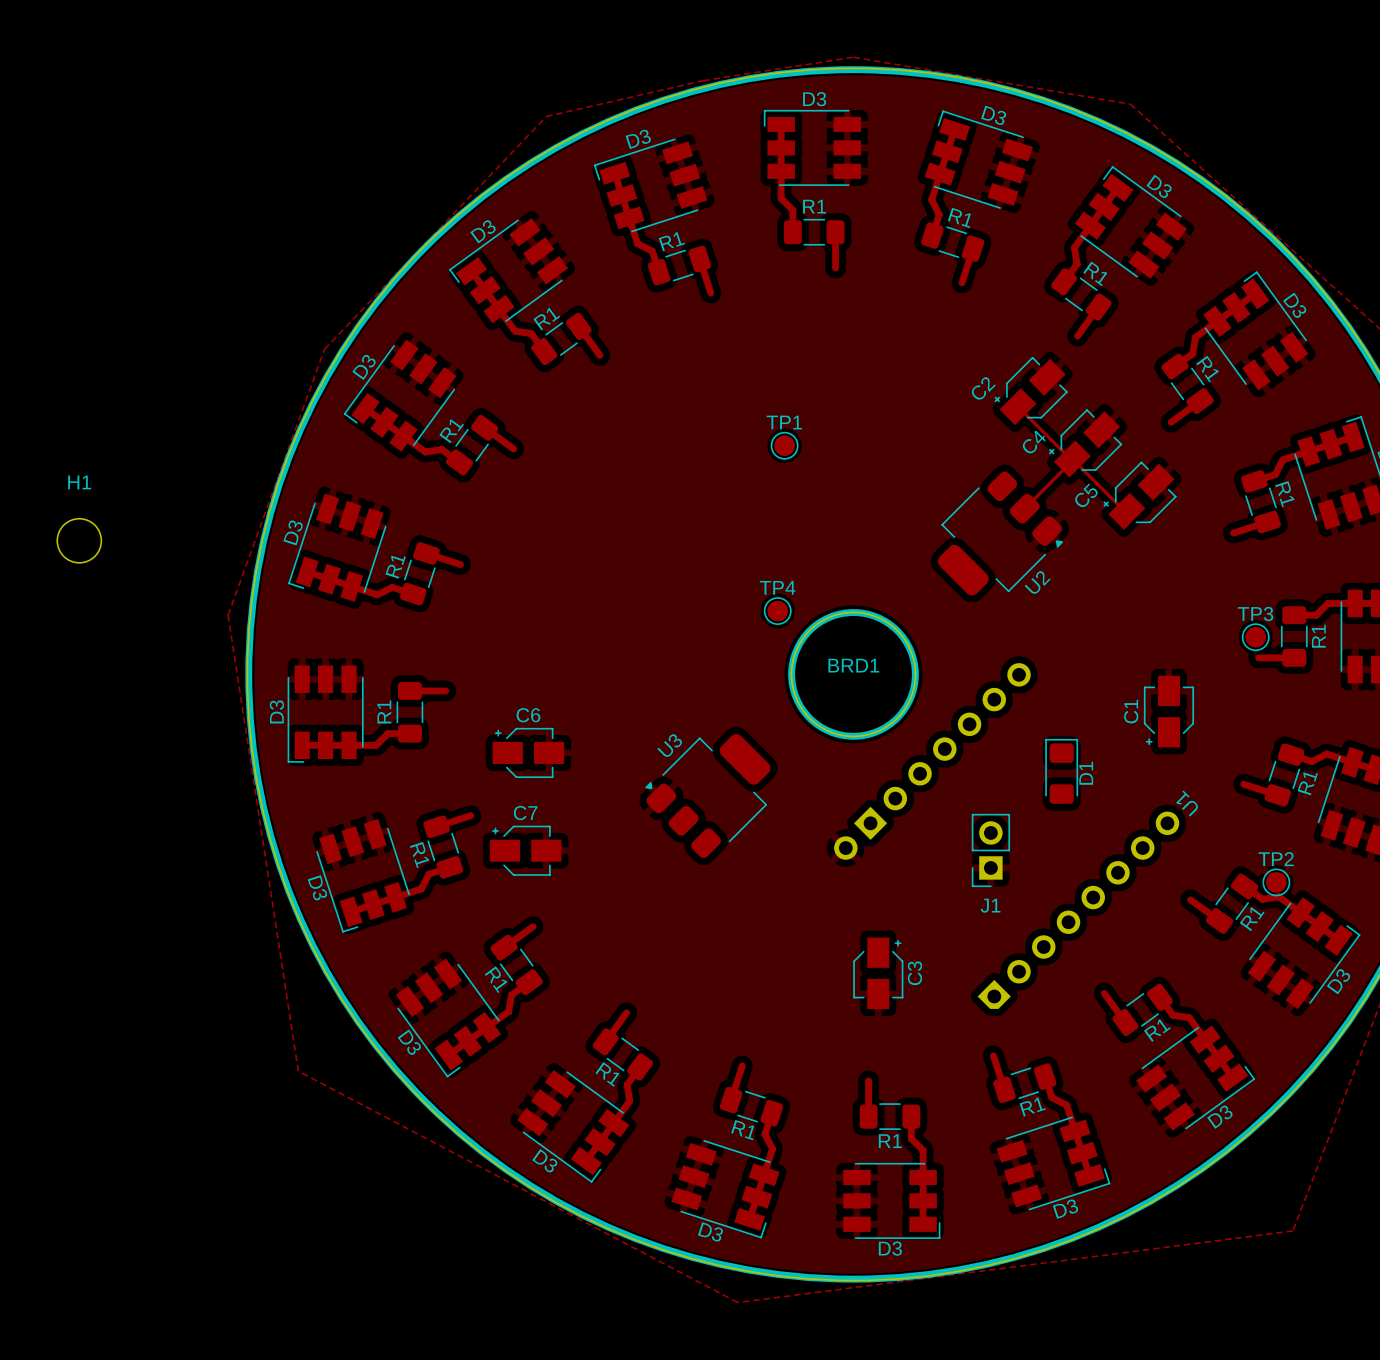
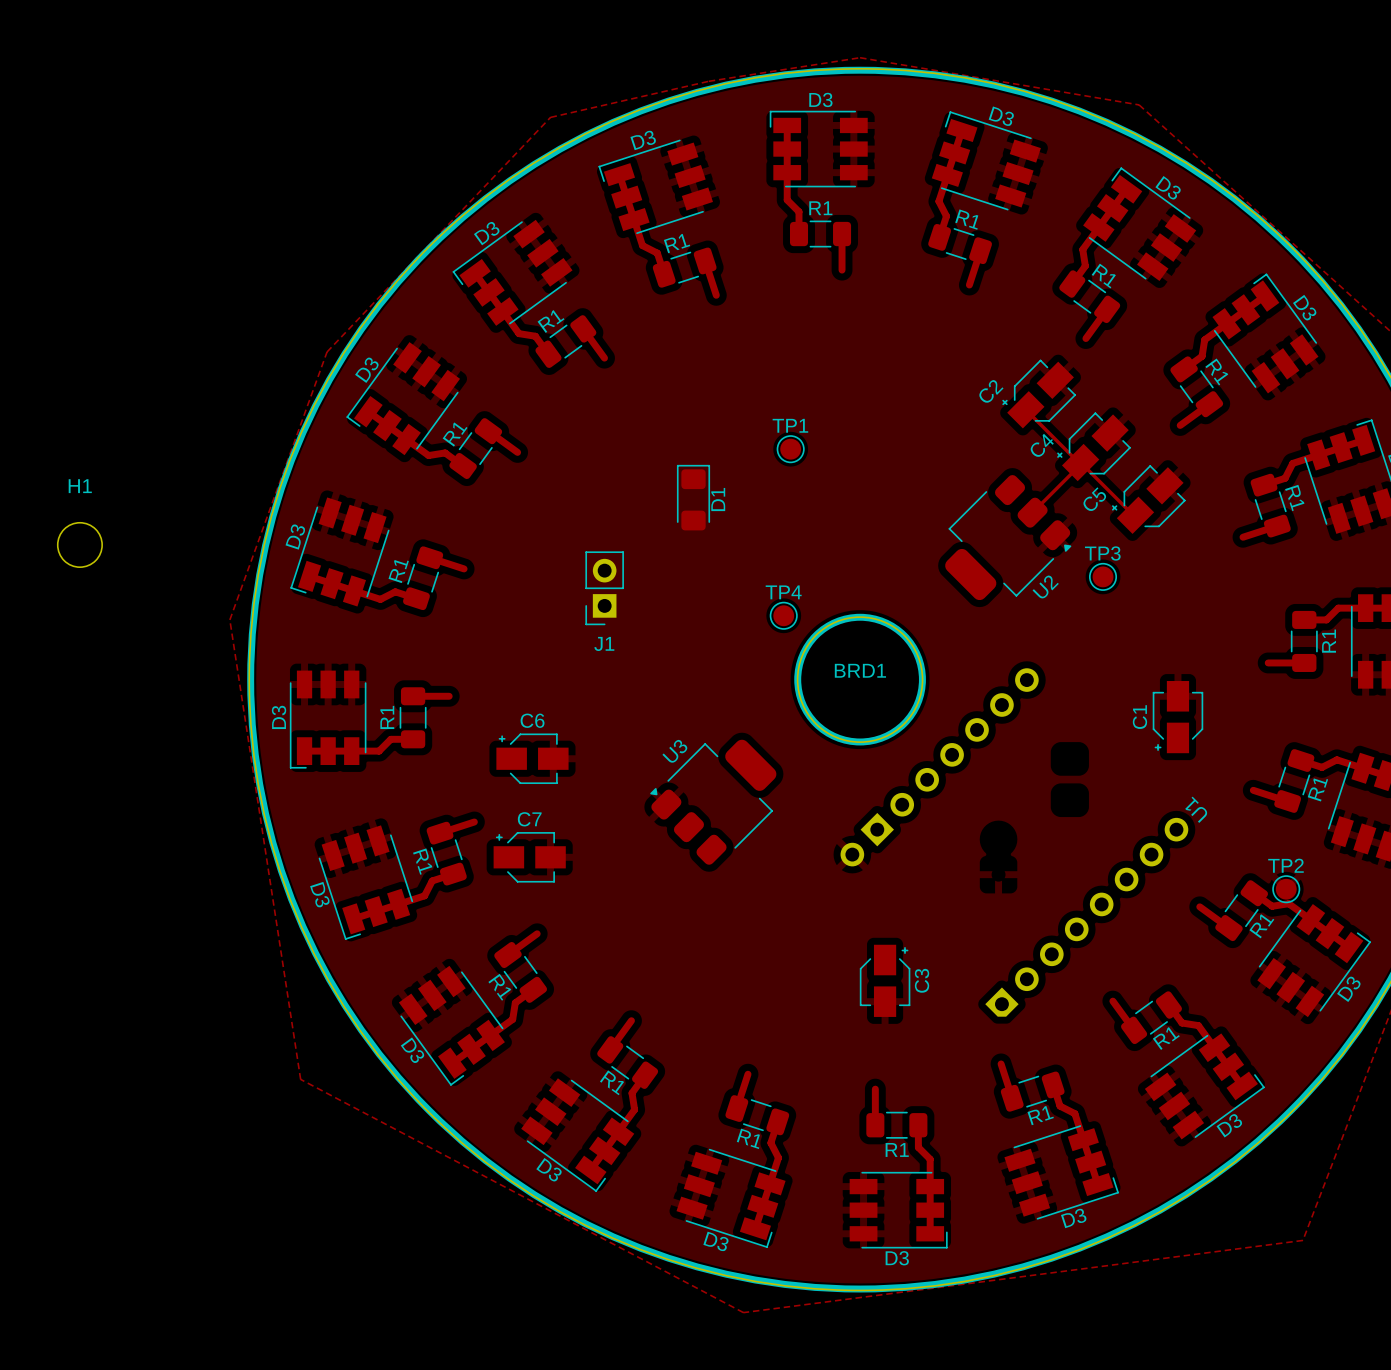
TP3 position: (1255, 637) -> (1103, 576)
D1 position: (1061, 771) -> (693, 497)
J1 position: (990, 850) -> (604, 588)

